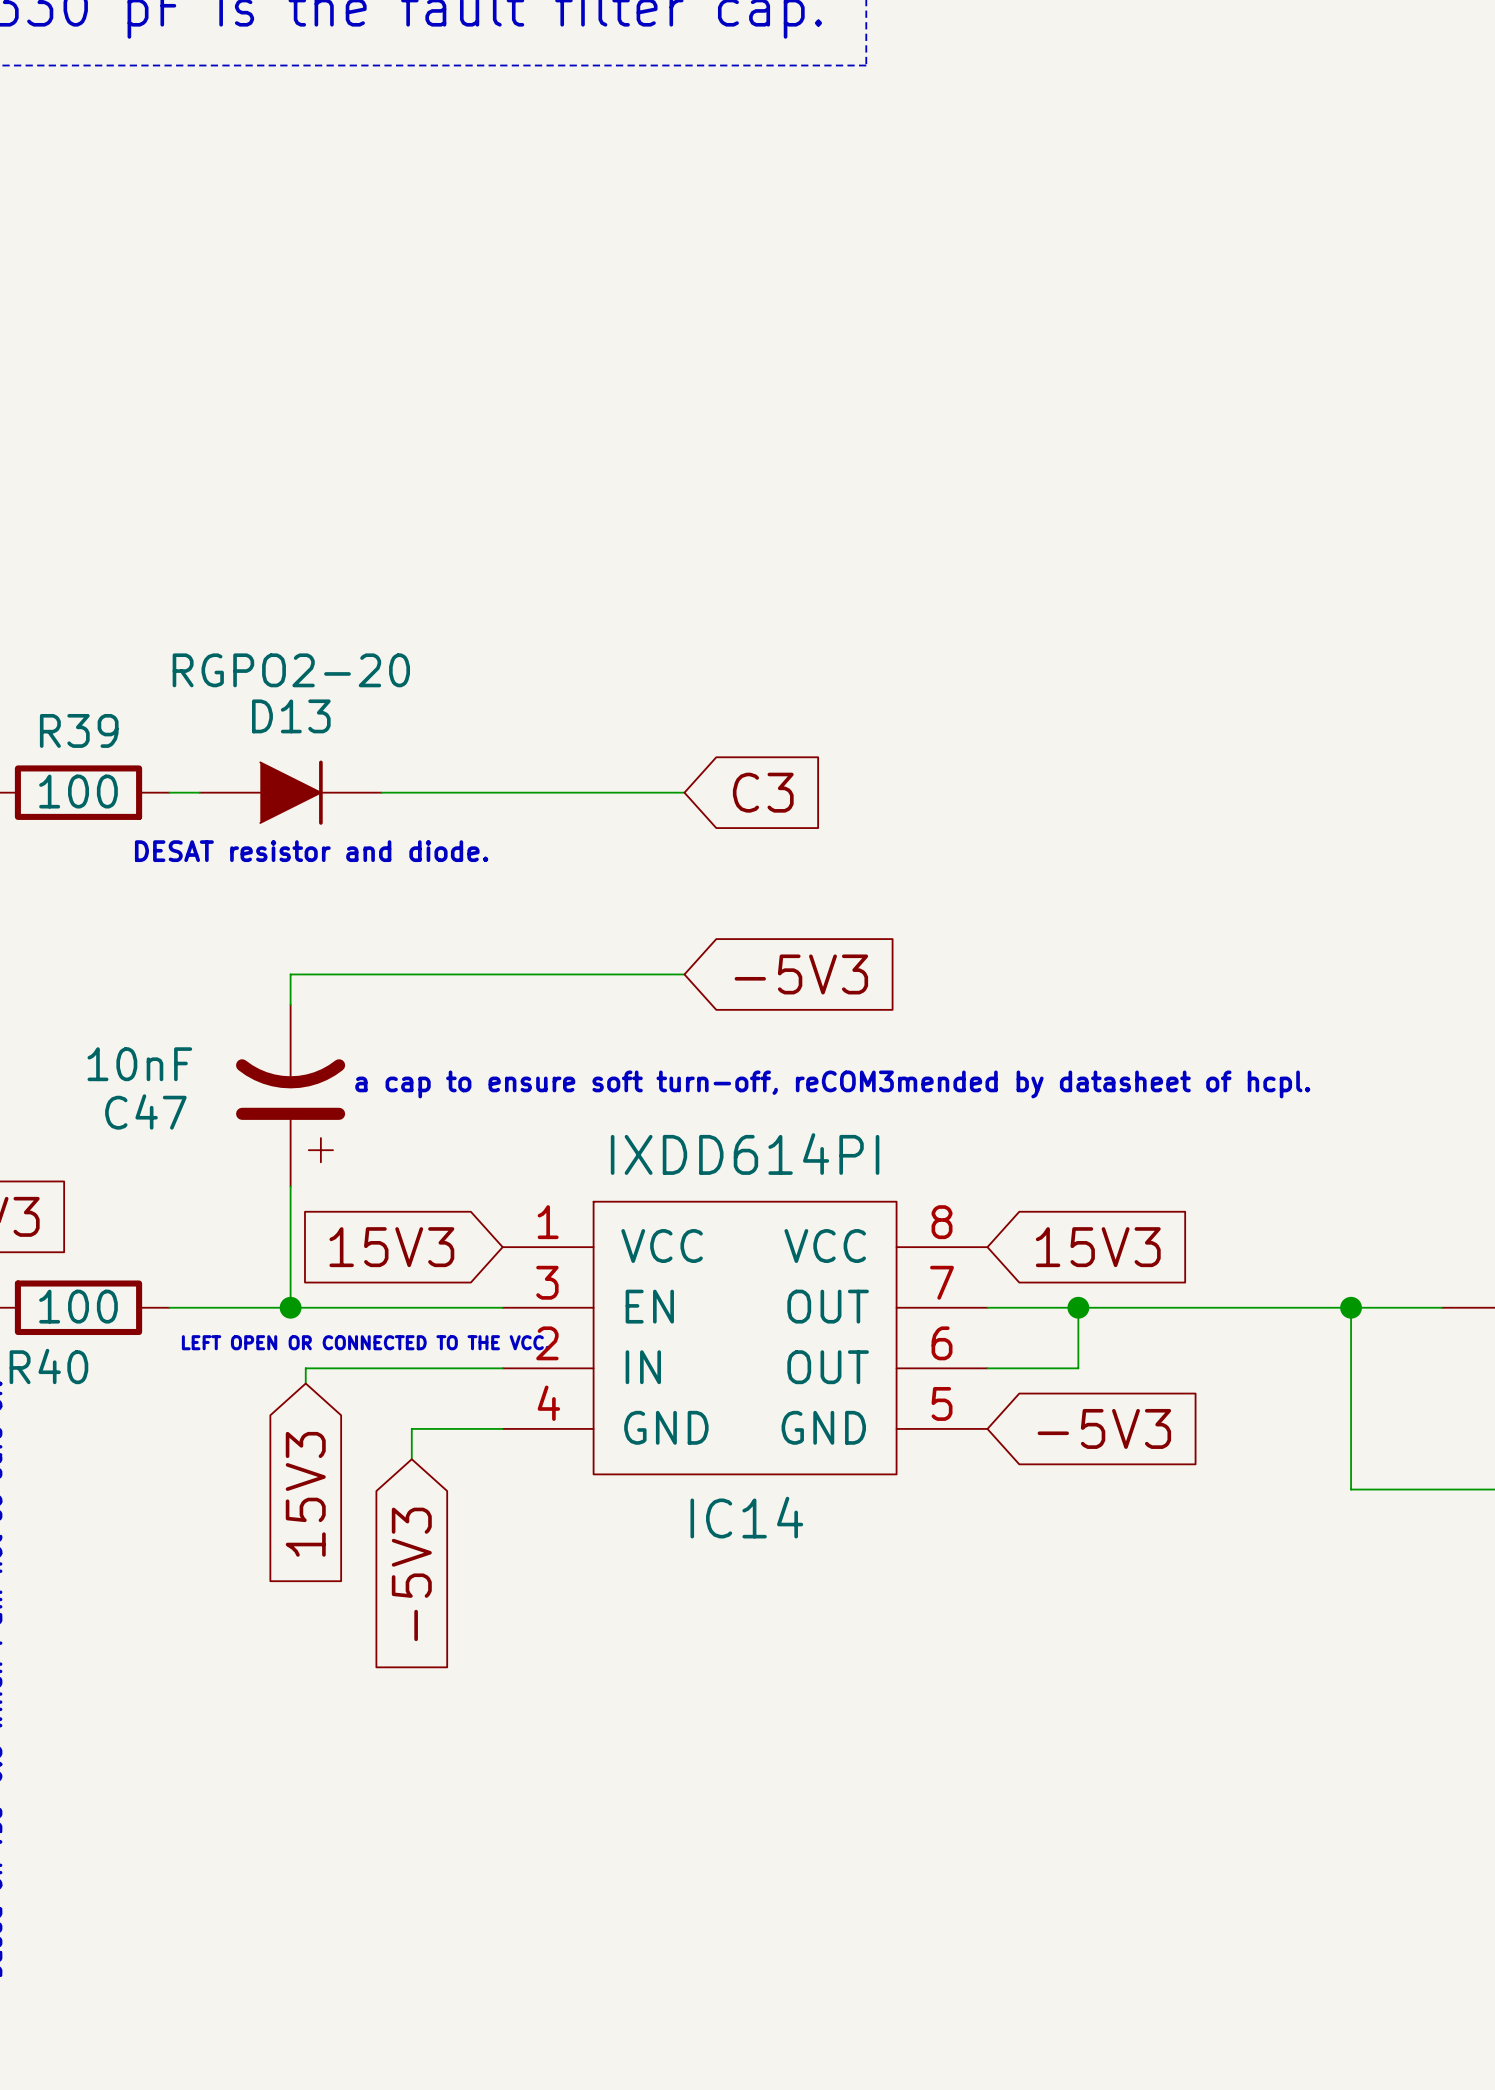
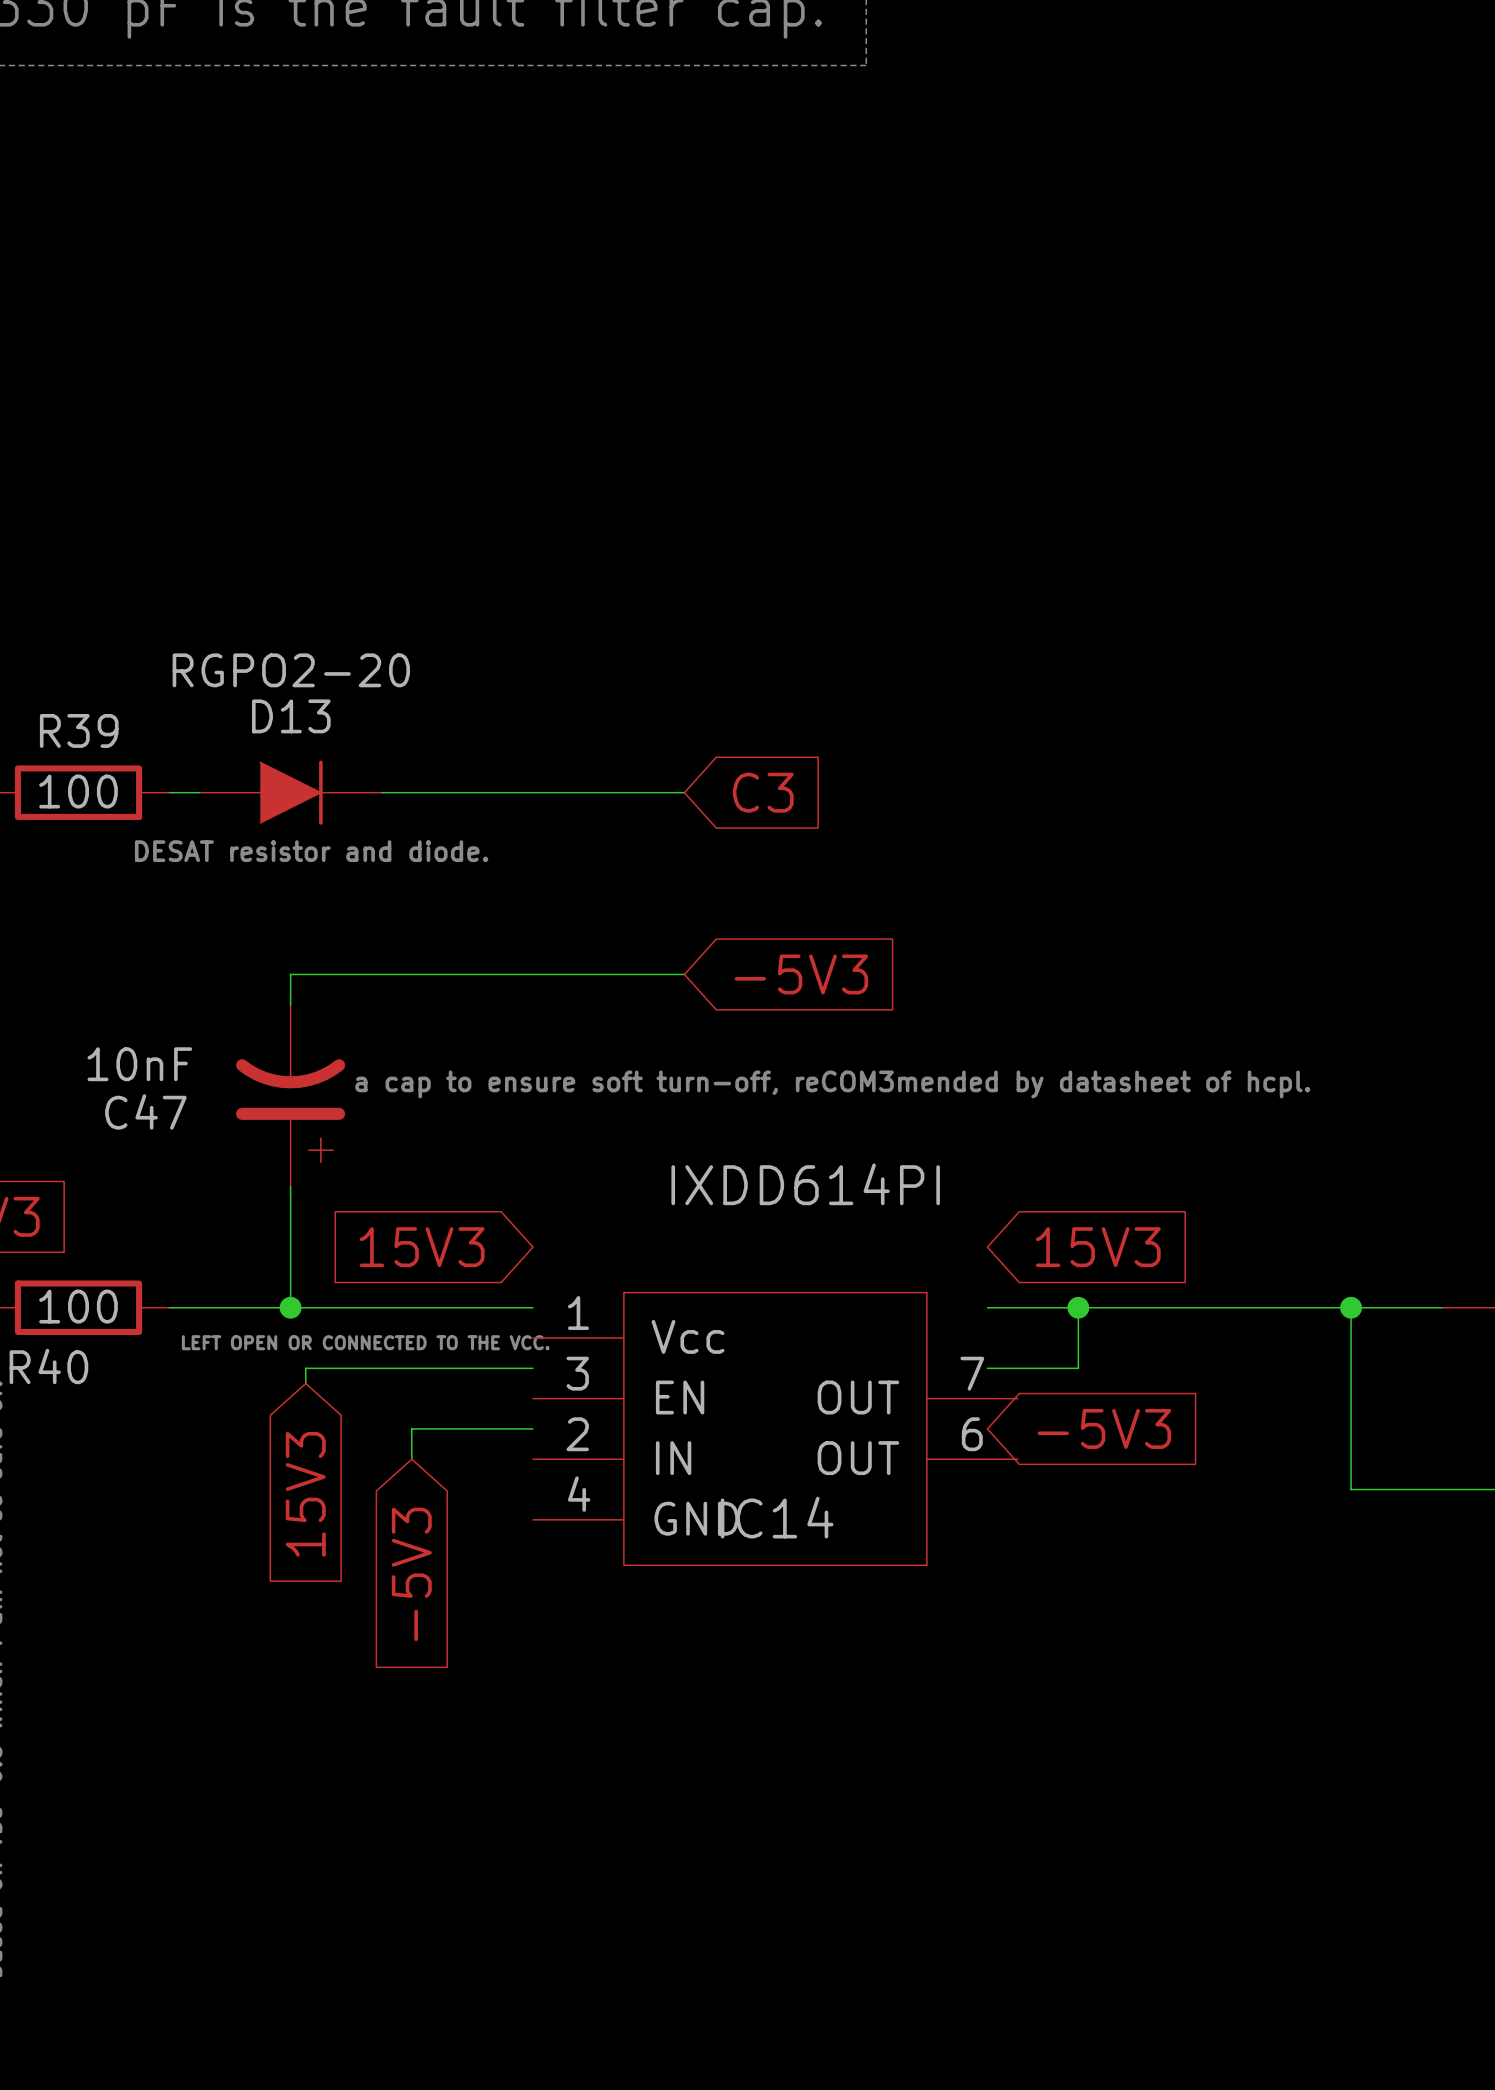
IC14 value position: IXDD614PI (745, 1154) -> IXDD614PI (805, 1184)
IC14 symbol: [502, 1201, 988, 1475] -> [532, 1292, 1018, 1566]
global label position: 15V3 (391, 1247) -> 15V3 (422, 1247)
IC14 name position: IC14 (746, 1517) -> IC14 (777, 1517)

